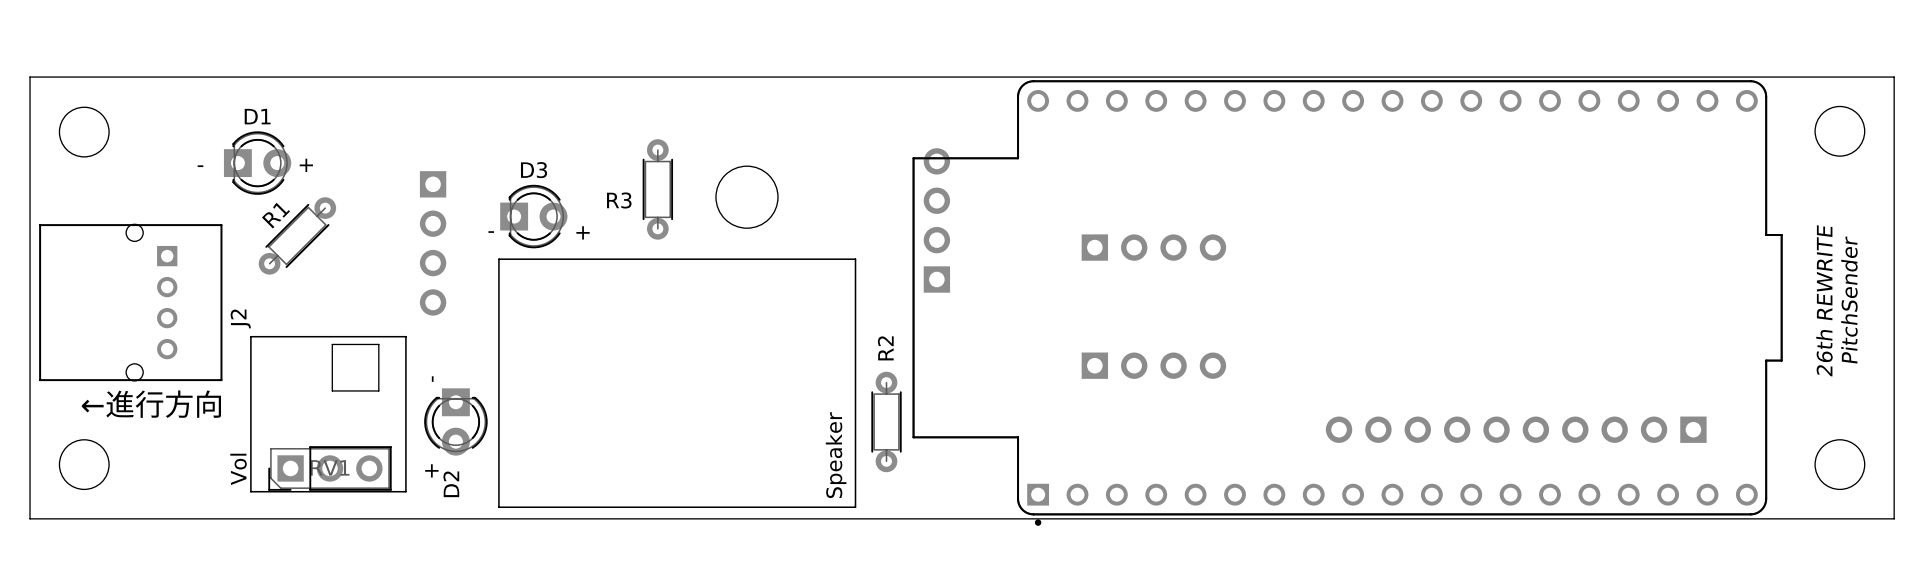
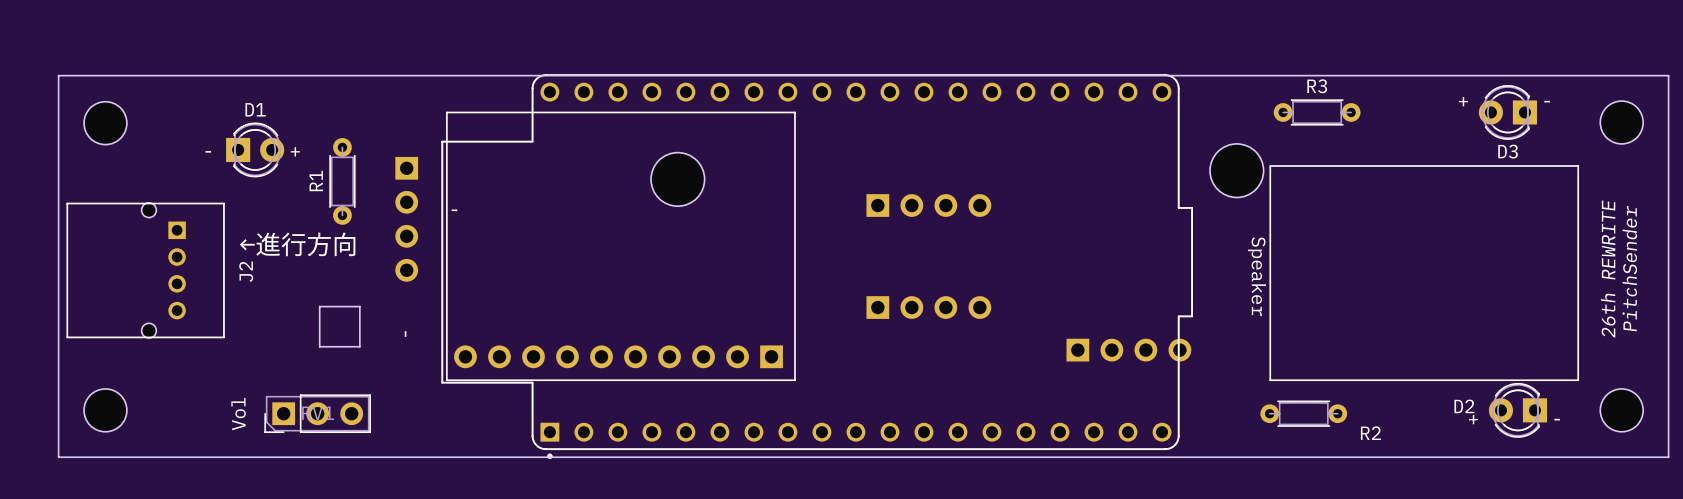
text: none -> + (1463, 101)
text: none -> - (1547, 101)
line: none -> (446, 112) (794, 112) (794, 380) (446, 380) (446, 112)
line: none -> (1270, 166) (1578, 166) (1578, 380) (1270, 380) (1270, 166)
part: none -> (1236, 170)
R3 rotation: 0° (657, 189) -> 90° clockwise (1317, 112)
R3 position: (657, 189) -> (1317, 112)
D3 rotation: 0° (533, 216) -> 180° (1507, 112)
D3 position: (533, 216) -> (1507, 112)
part: (936, 220) -> none
part: none -> (928, 205)
text: + (583, 232) -> none
R1 rotation: 0° (297, 235) -> 45° counterclockwise (342, 181)
R1 position: (297, 235) -> (342, 181)
part: (1153, 247) -> none
line: (498, 259) (855, 259) (855, 507) (498, 507) (498, 259) -> none
part: none -> (817, 266)
part: (1347, 302) -> none
text: none -> Speaker (1257, 276)
J2 name position: J2 (240, 318) -> J2 (246, 271)
line: (250, 336) (405, 336) (405, 491) (250, 491) (250, 336) -> none
part: none -> (928, 307)
part: (1153, 365) -> none
part: none -> (1128, 350)
part: none -> (618, 356)
text position: ←進行方向 (151, 404) -> ←進行方向 (297, 244)
D2 rotation: 0° (455, 421) -> 90° clockwise (1517, 410)
D2 position: (455, 421) -> (1517, 410)
R2 rotation: 0° (886, 421) -> 90° clockwise (1303, 413)
R2 position: (886, 421) -> (1303, 413)
part: (1516, 429) -> none
text: Speaker (836, 455) -> none
text: + (431, 470) -> none
text: none -> + (1473, 419)
text: none -> - (1557, 419)

